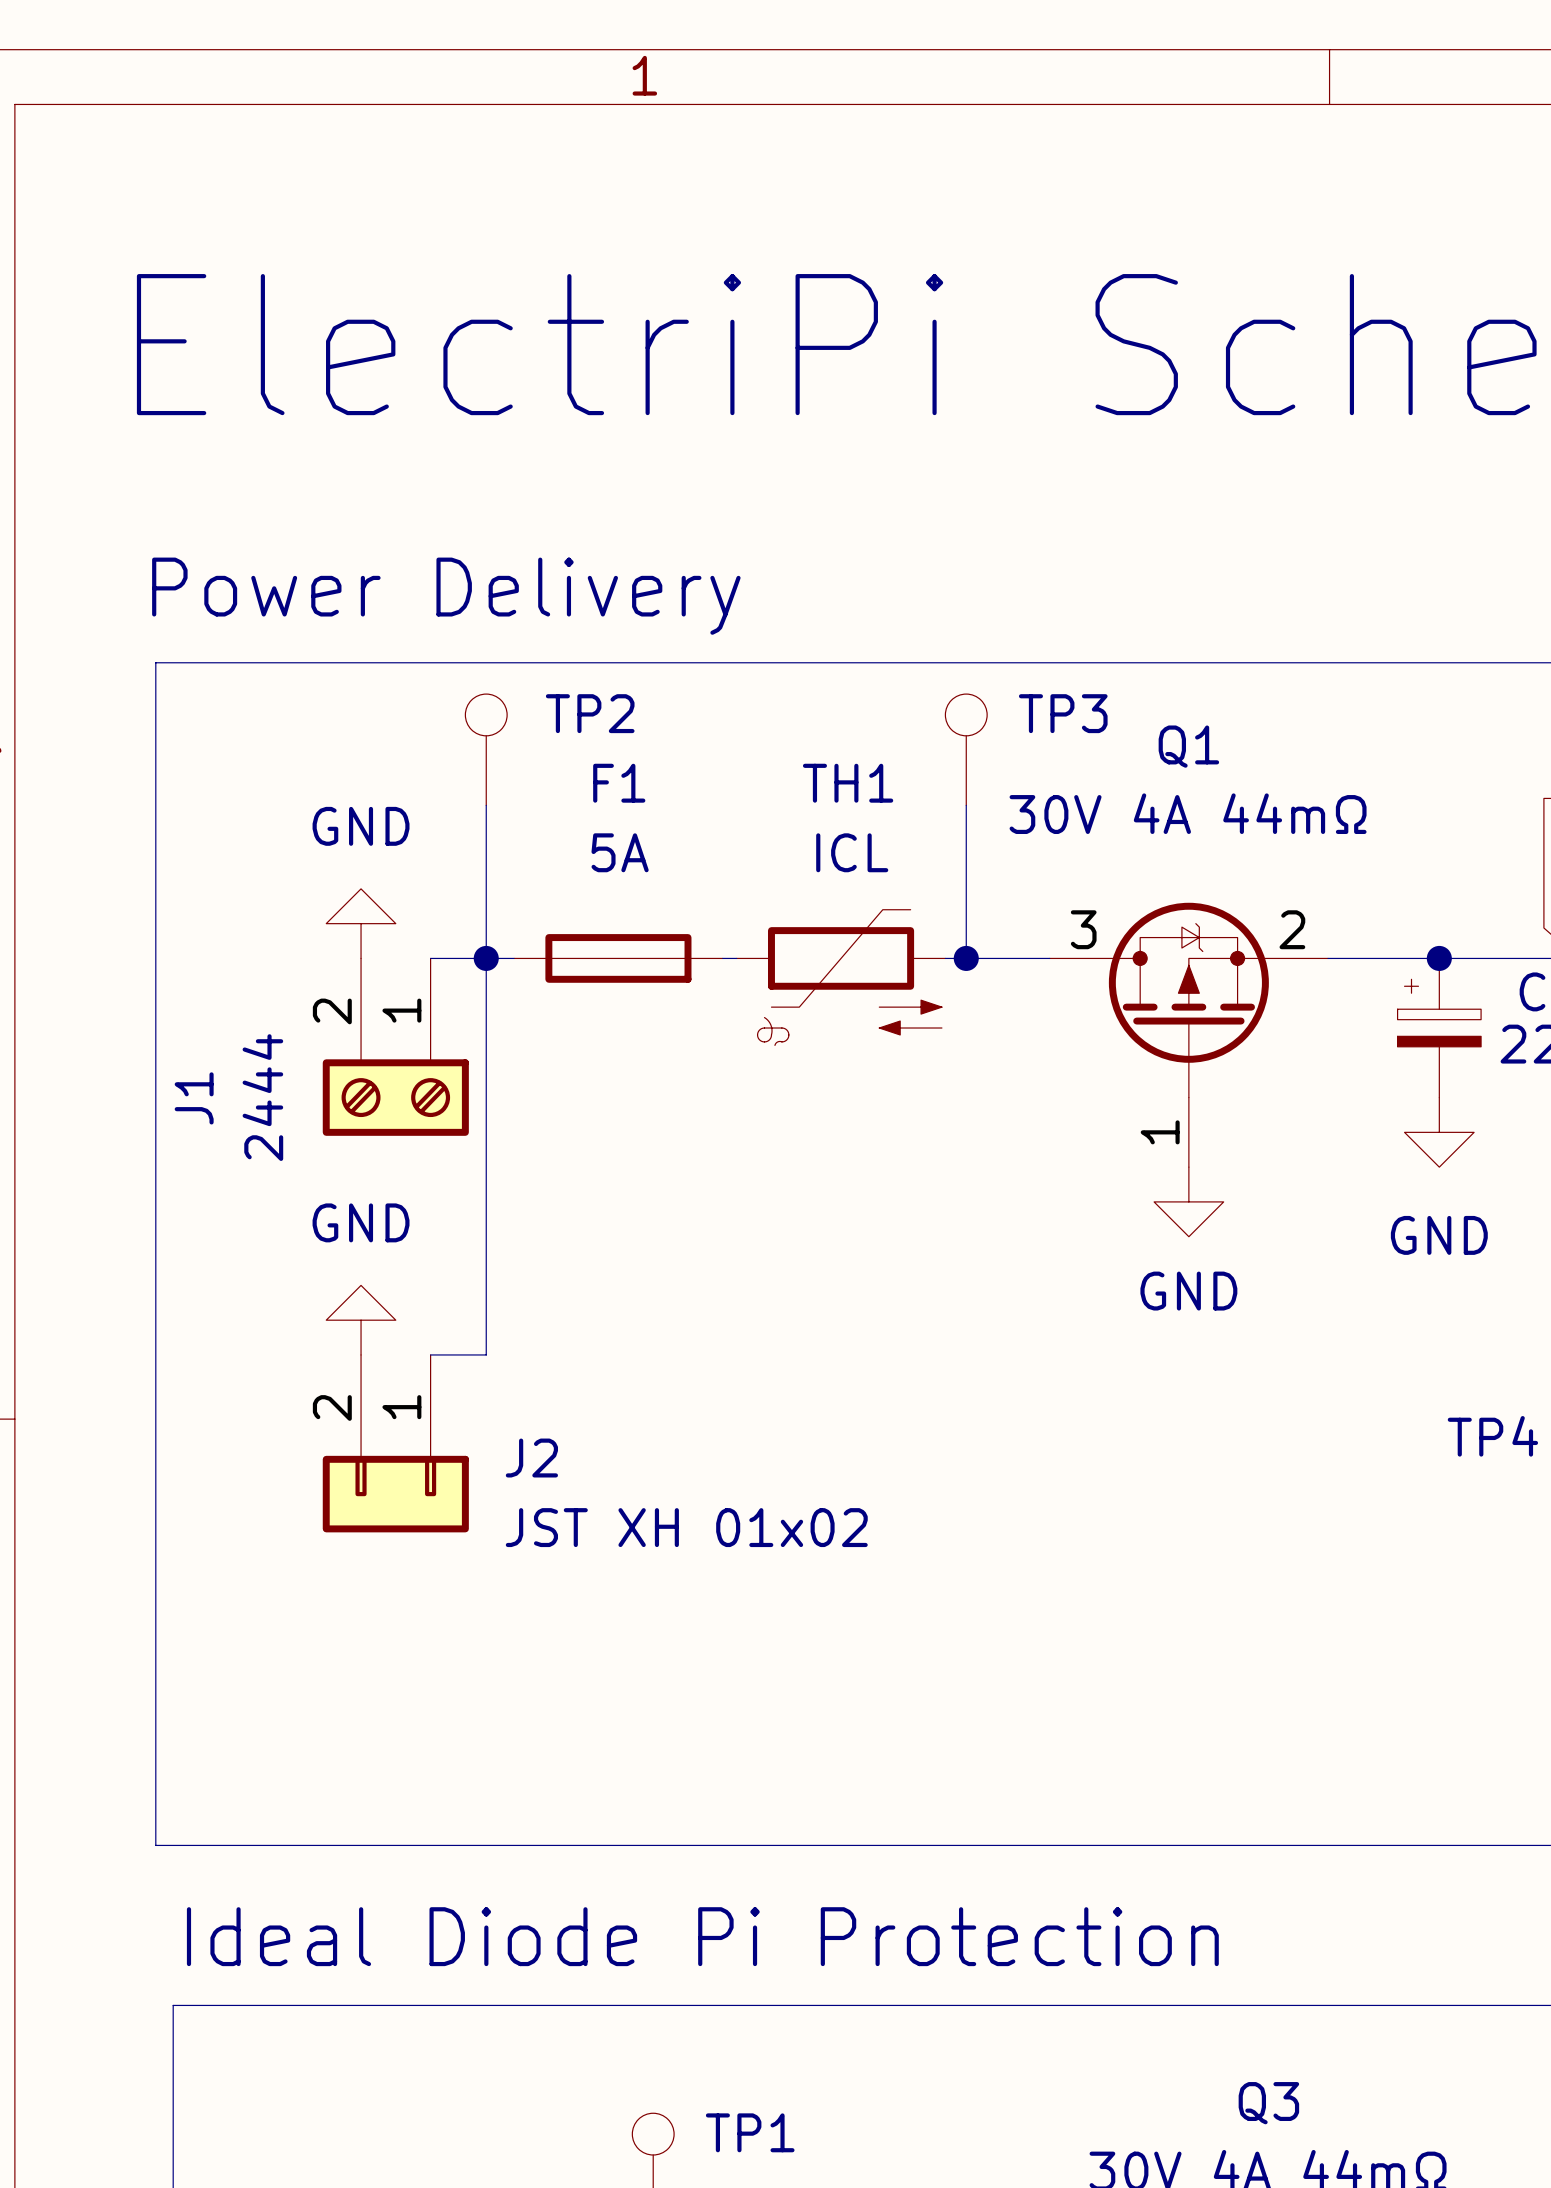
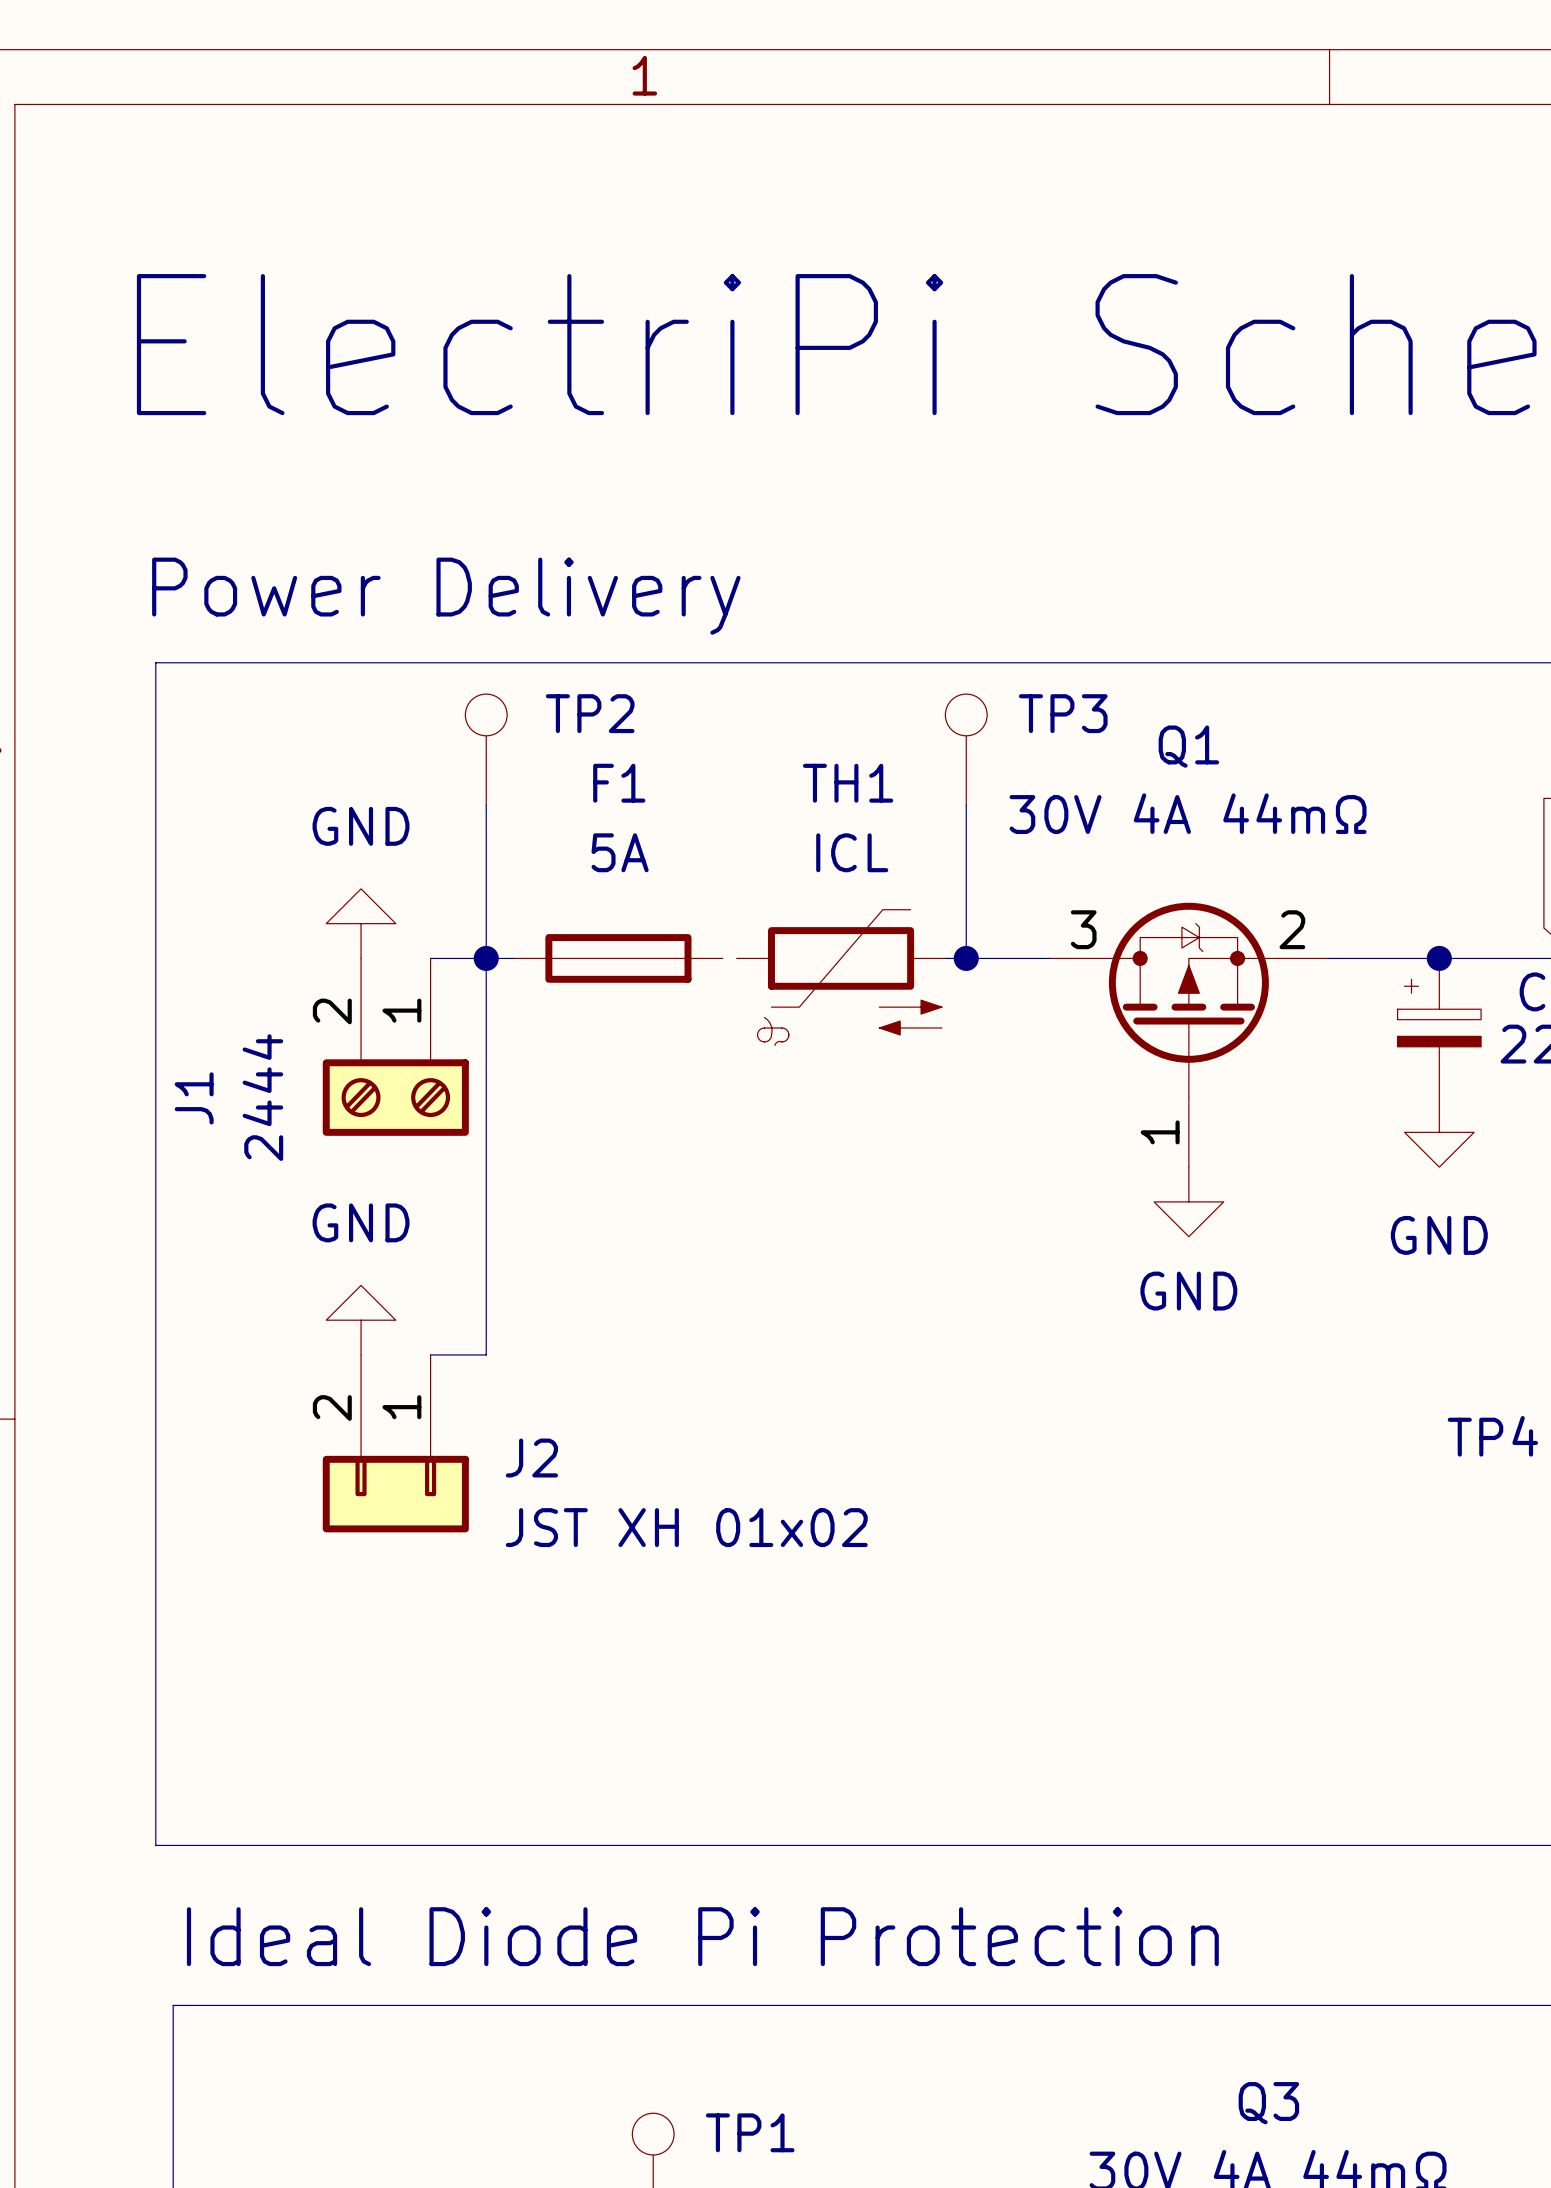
wire: (722, 958) (736, 958) -> none

